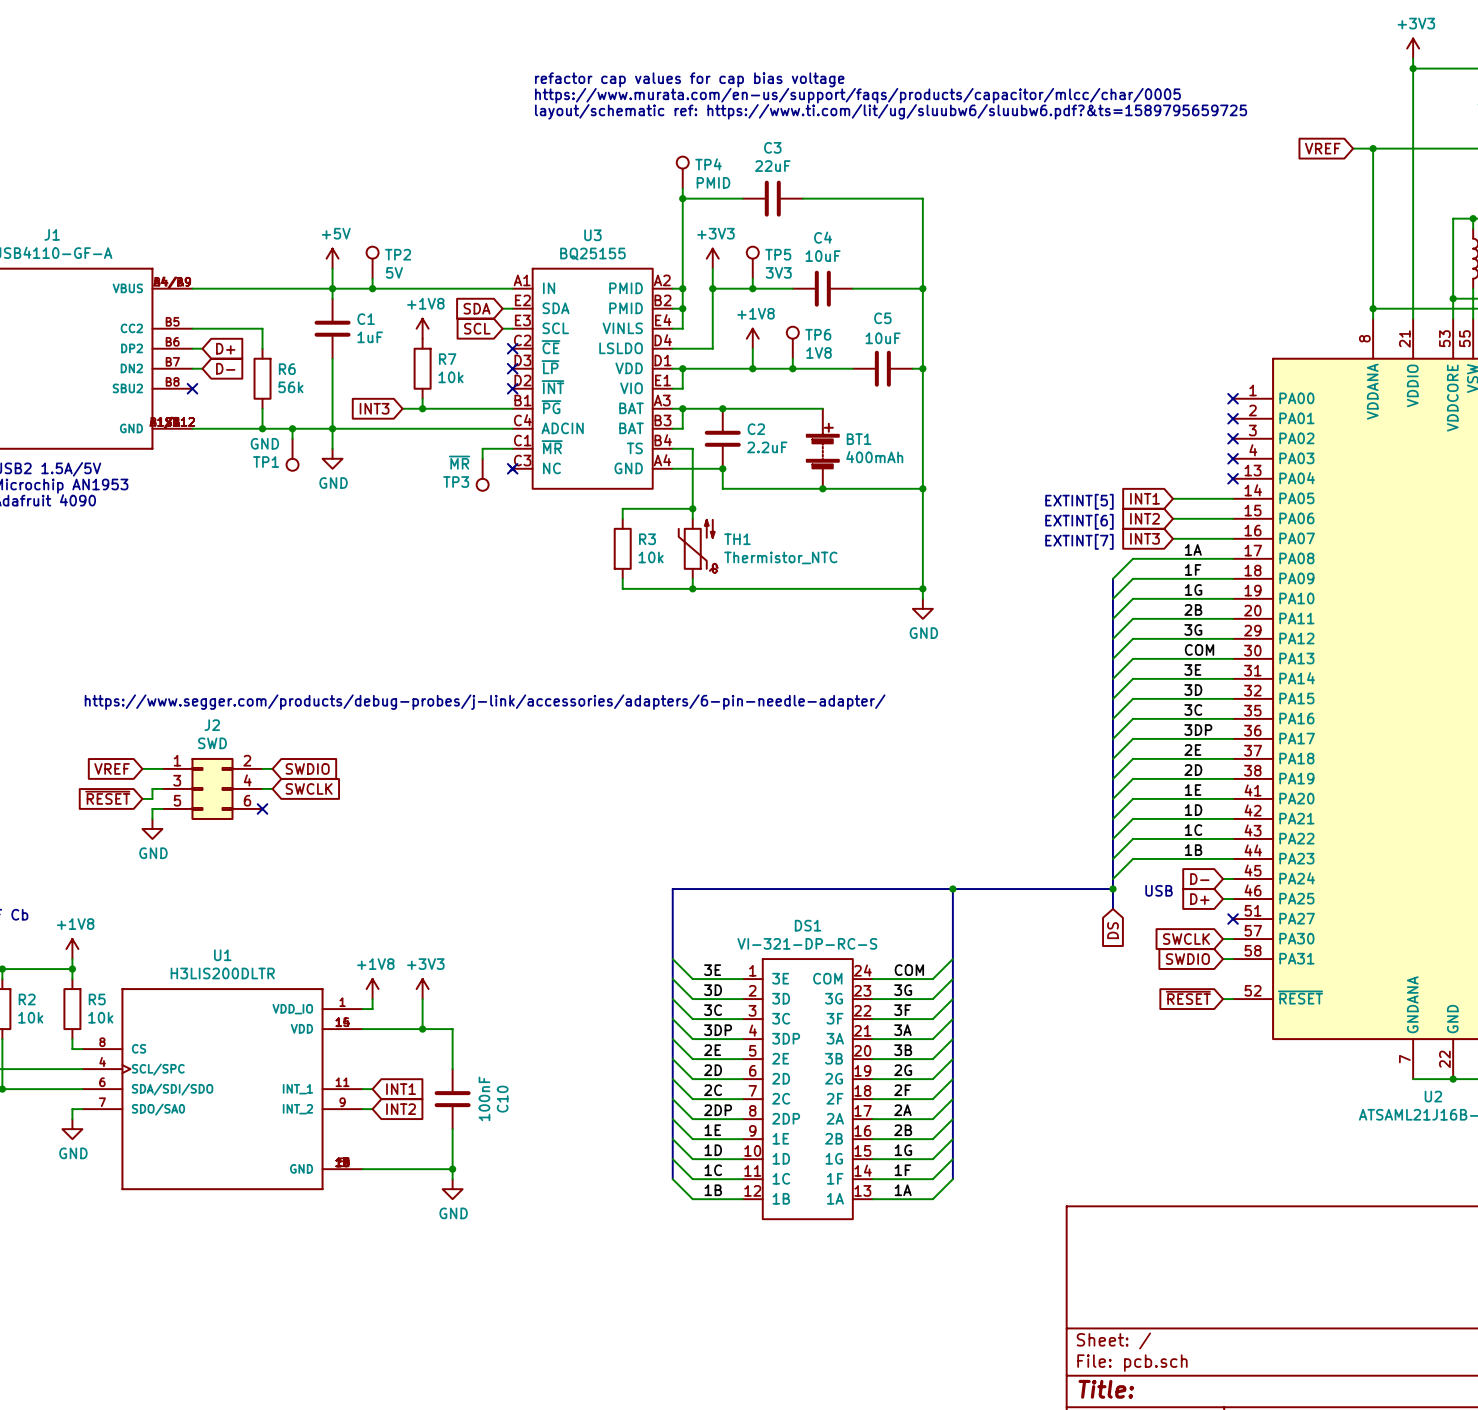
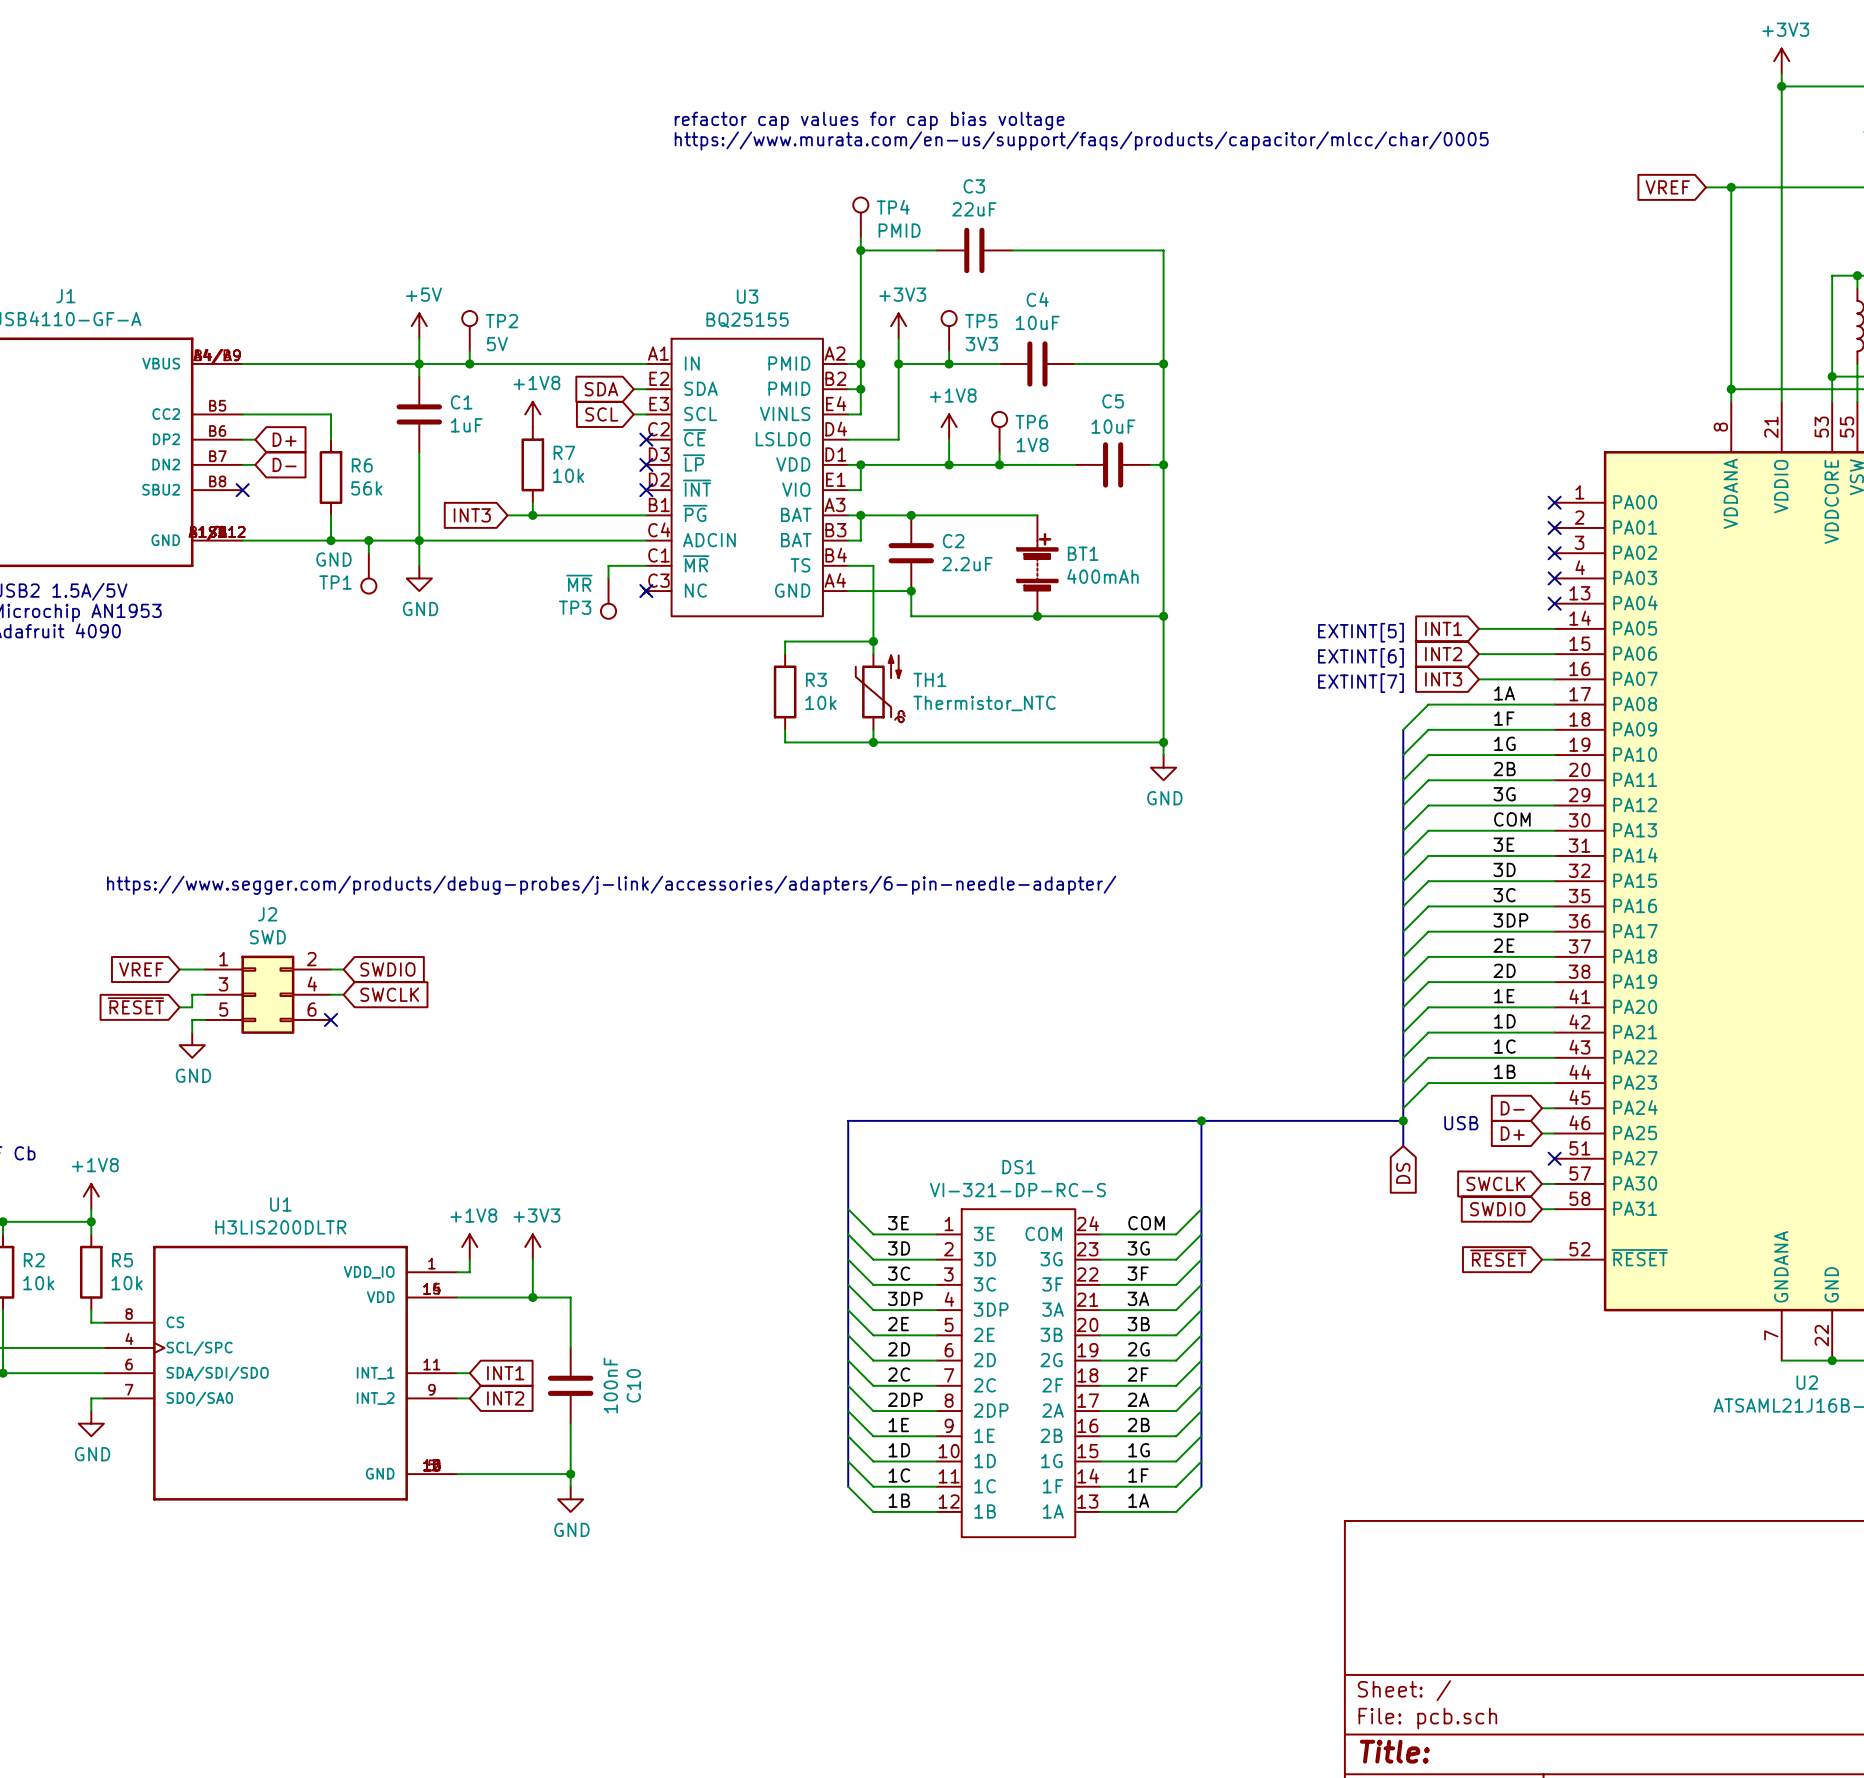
text: refactor cap values for cap bias voltage (689, 79) -> none
text: https://www.murata.com/en-us/support/faqs/products/capacitor/mlcc/char/0005 (857, 95) -> refactor cap values for cap bias voltage (869, 120)
text: layout/schematic ref: https://www.ti.com/lit/ug/sluubw6/sluubw6.pdf?&ts=1589795659725 (891, 111) -> https://www.murata.com/en-us/support/faqs/products/capacitor/mlcc/char/0005 (1081, 141)

